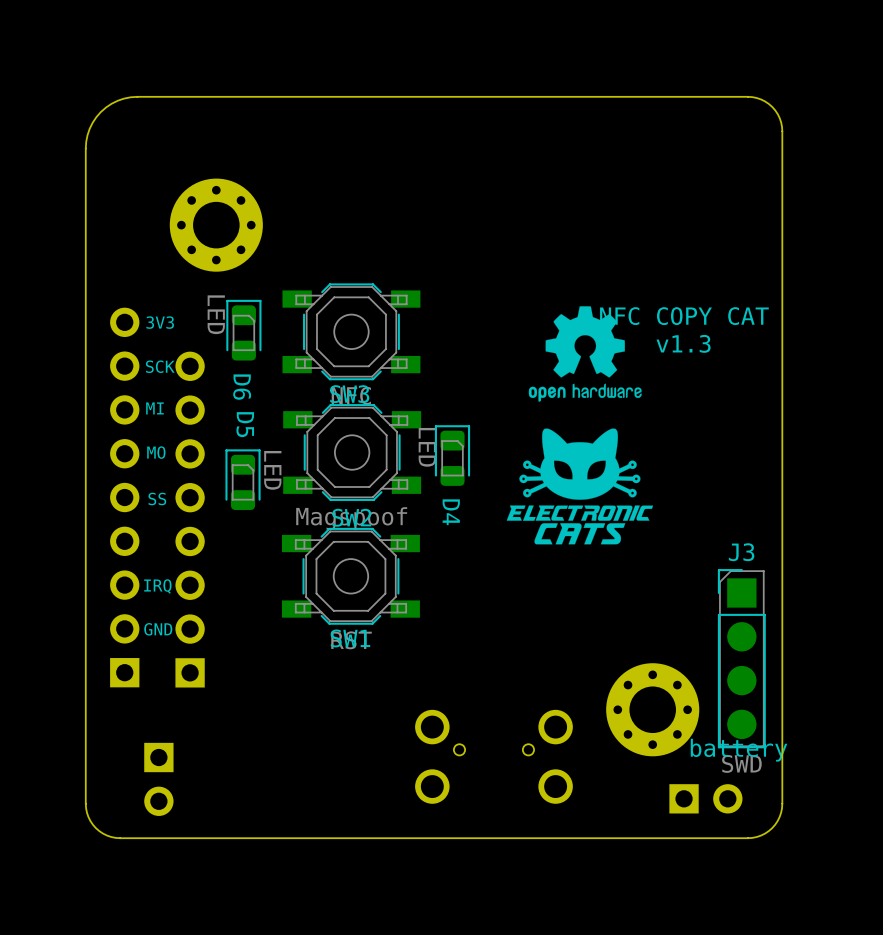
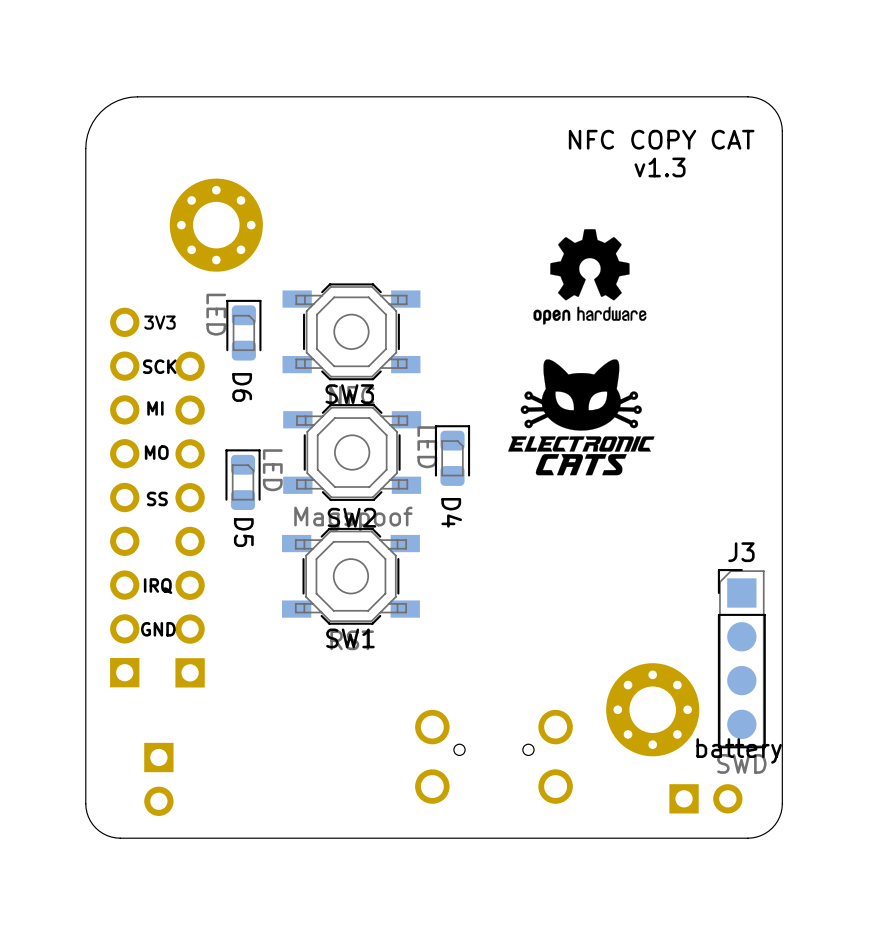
text position: NFC COPY CAT (684, 316) -> NFC COPY CAT (661, 139)
text position: v1.3 (683, 343) -> v1.3 (660, 167)
drawing position: (585, 354) -> (589, 276)
D5 name position: D5 (245, 424) -> D5 (243, 532)
drawing position: (579, 486) -> (581, 417)

